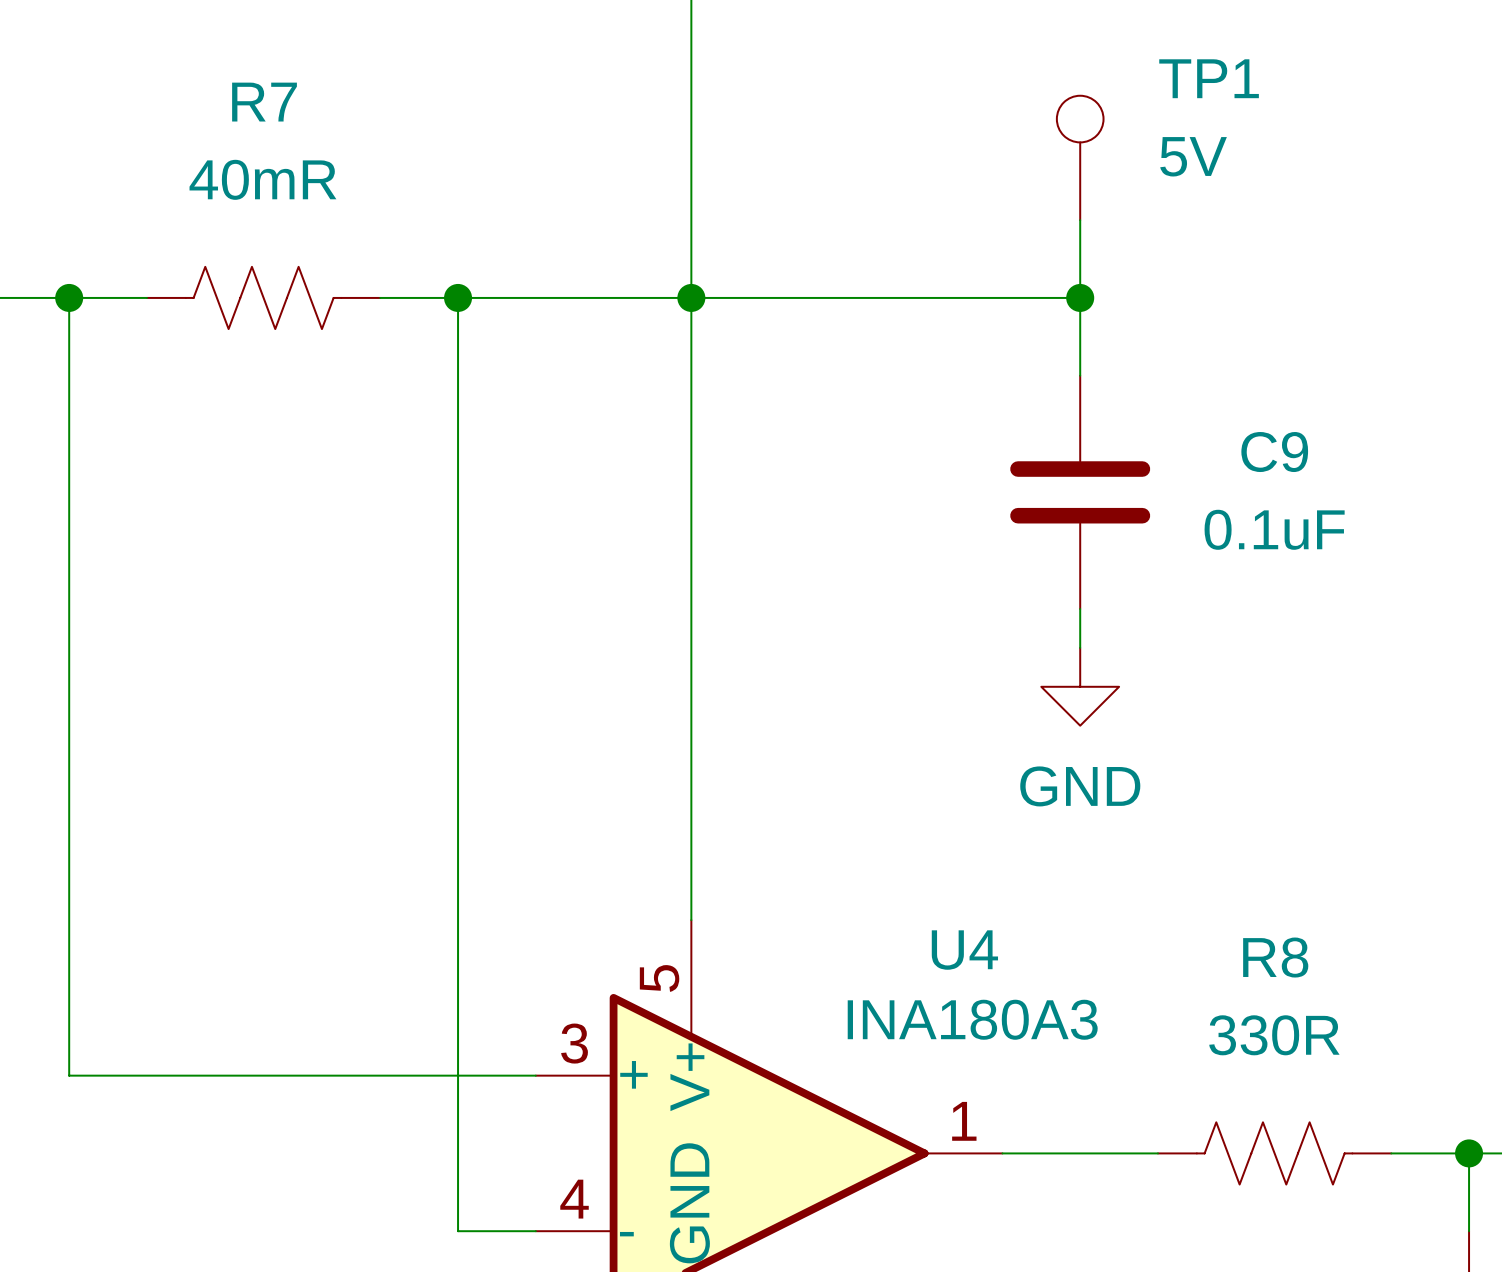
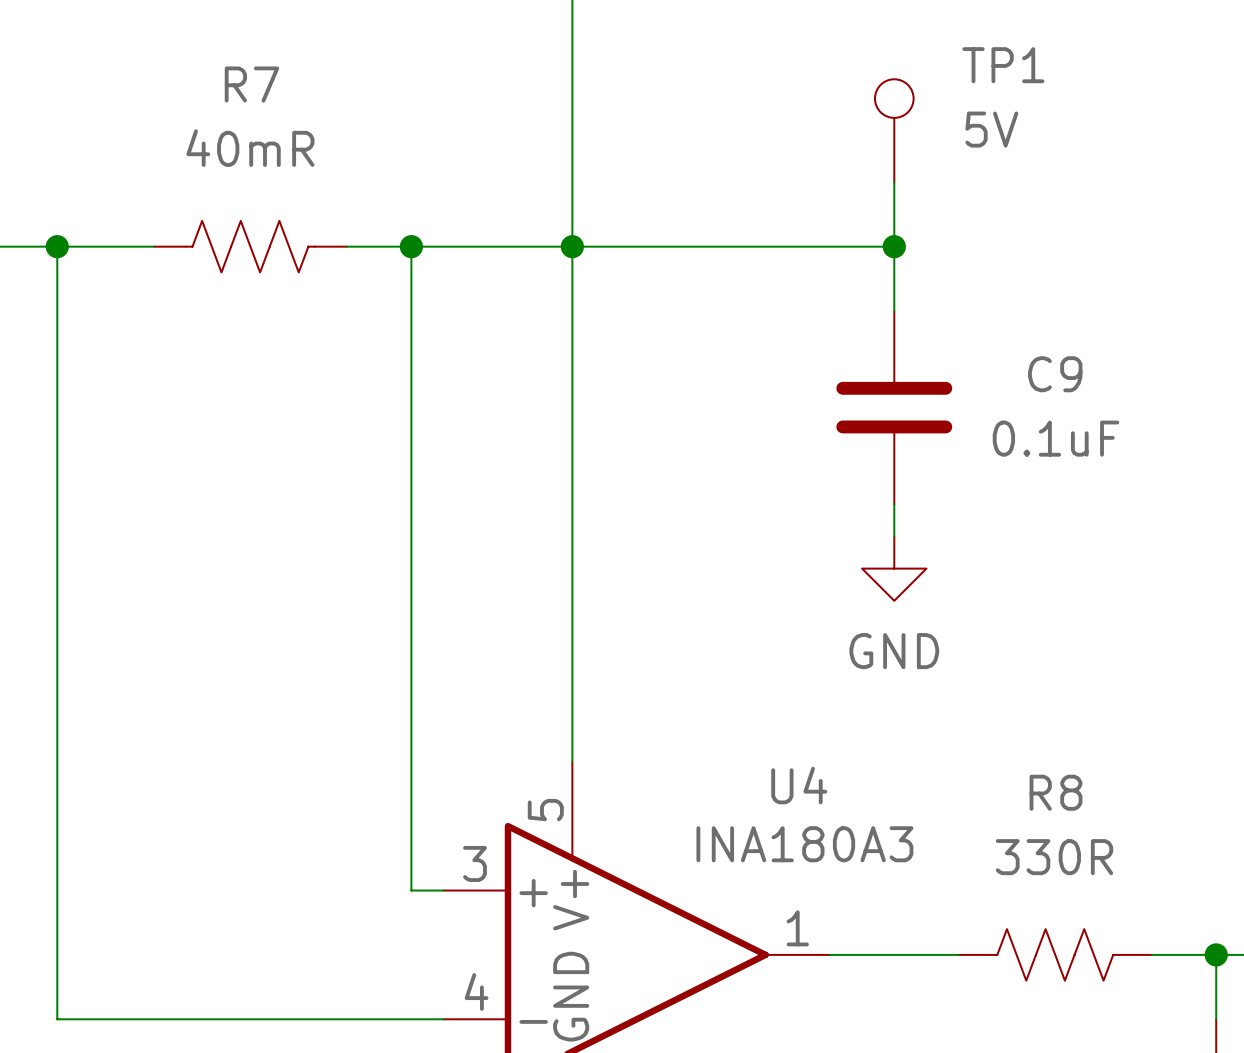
R7 position: (263, 297) -> (250, 246)
wire: (458, 297) (458, 1231) -> none
junction position: (458, 297) -> (411, 246)
wire: none -> (411, 246) (411, 890)
wire: (69, 1075) (496, 1075) -> (57, 890) (57, 1019) (379, 1019)

